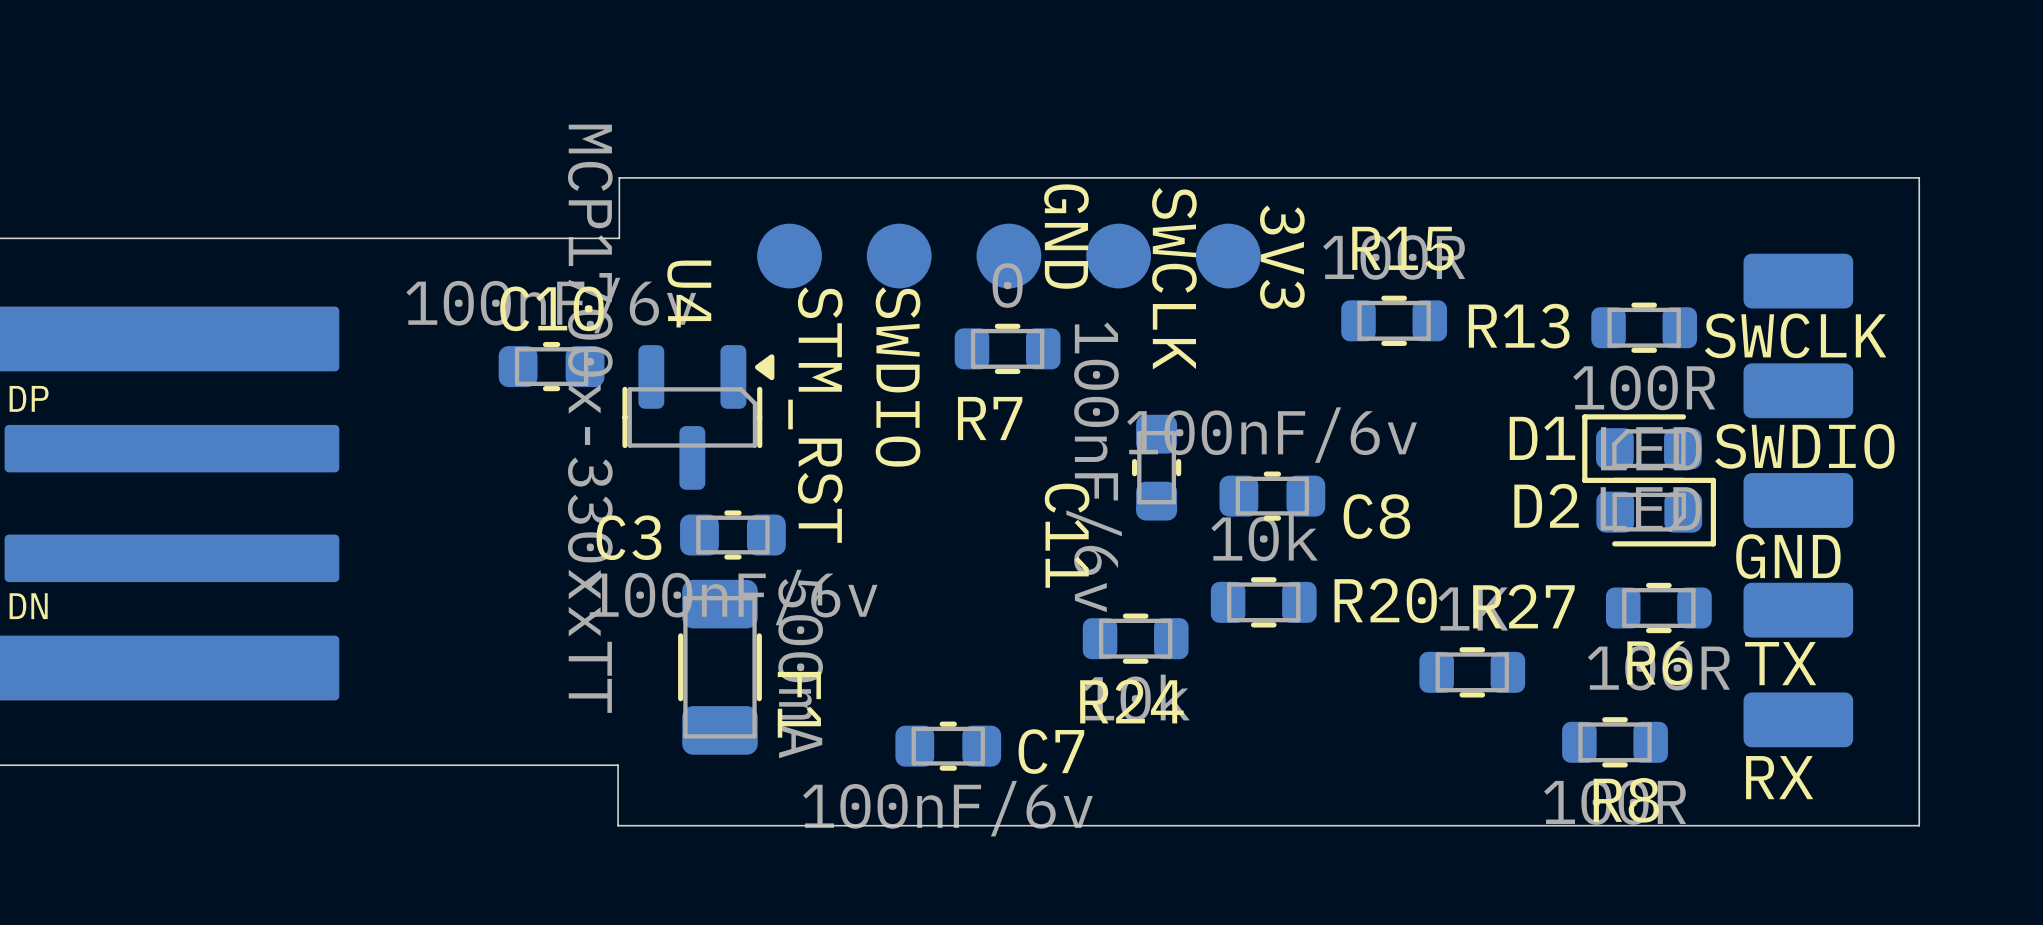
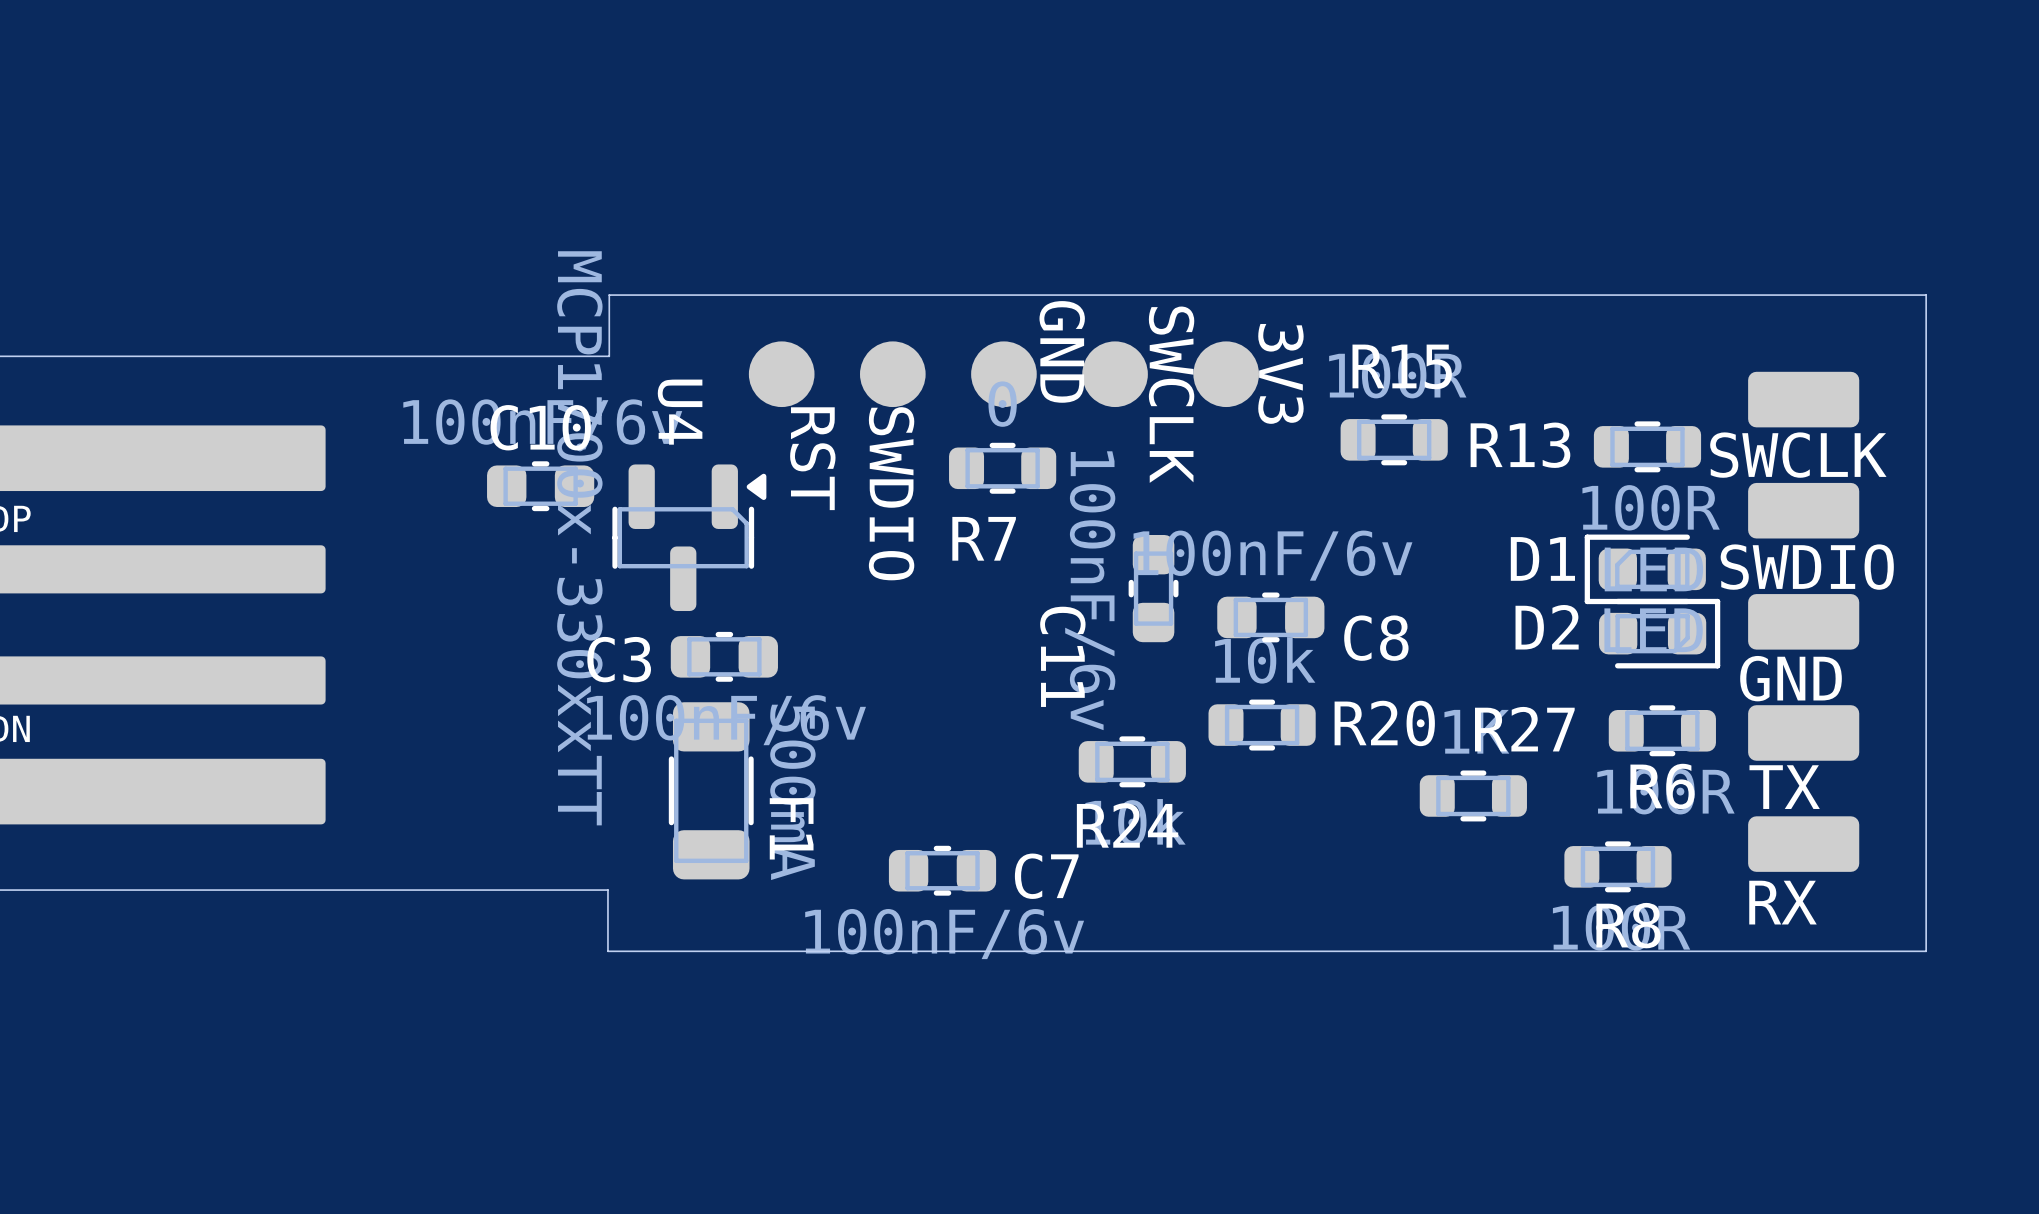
text: STM_RST (815, 415) -> RST (812, 458)

